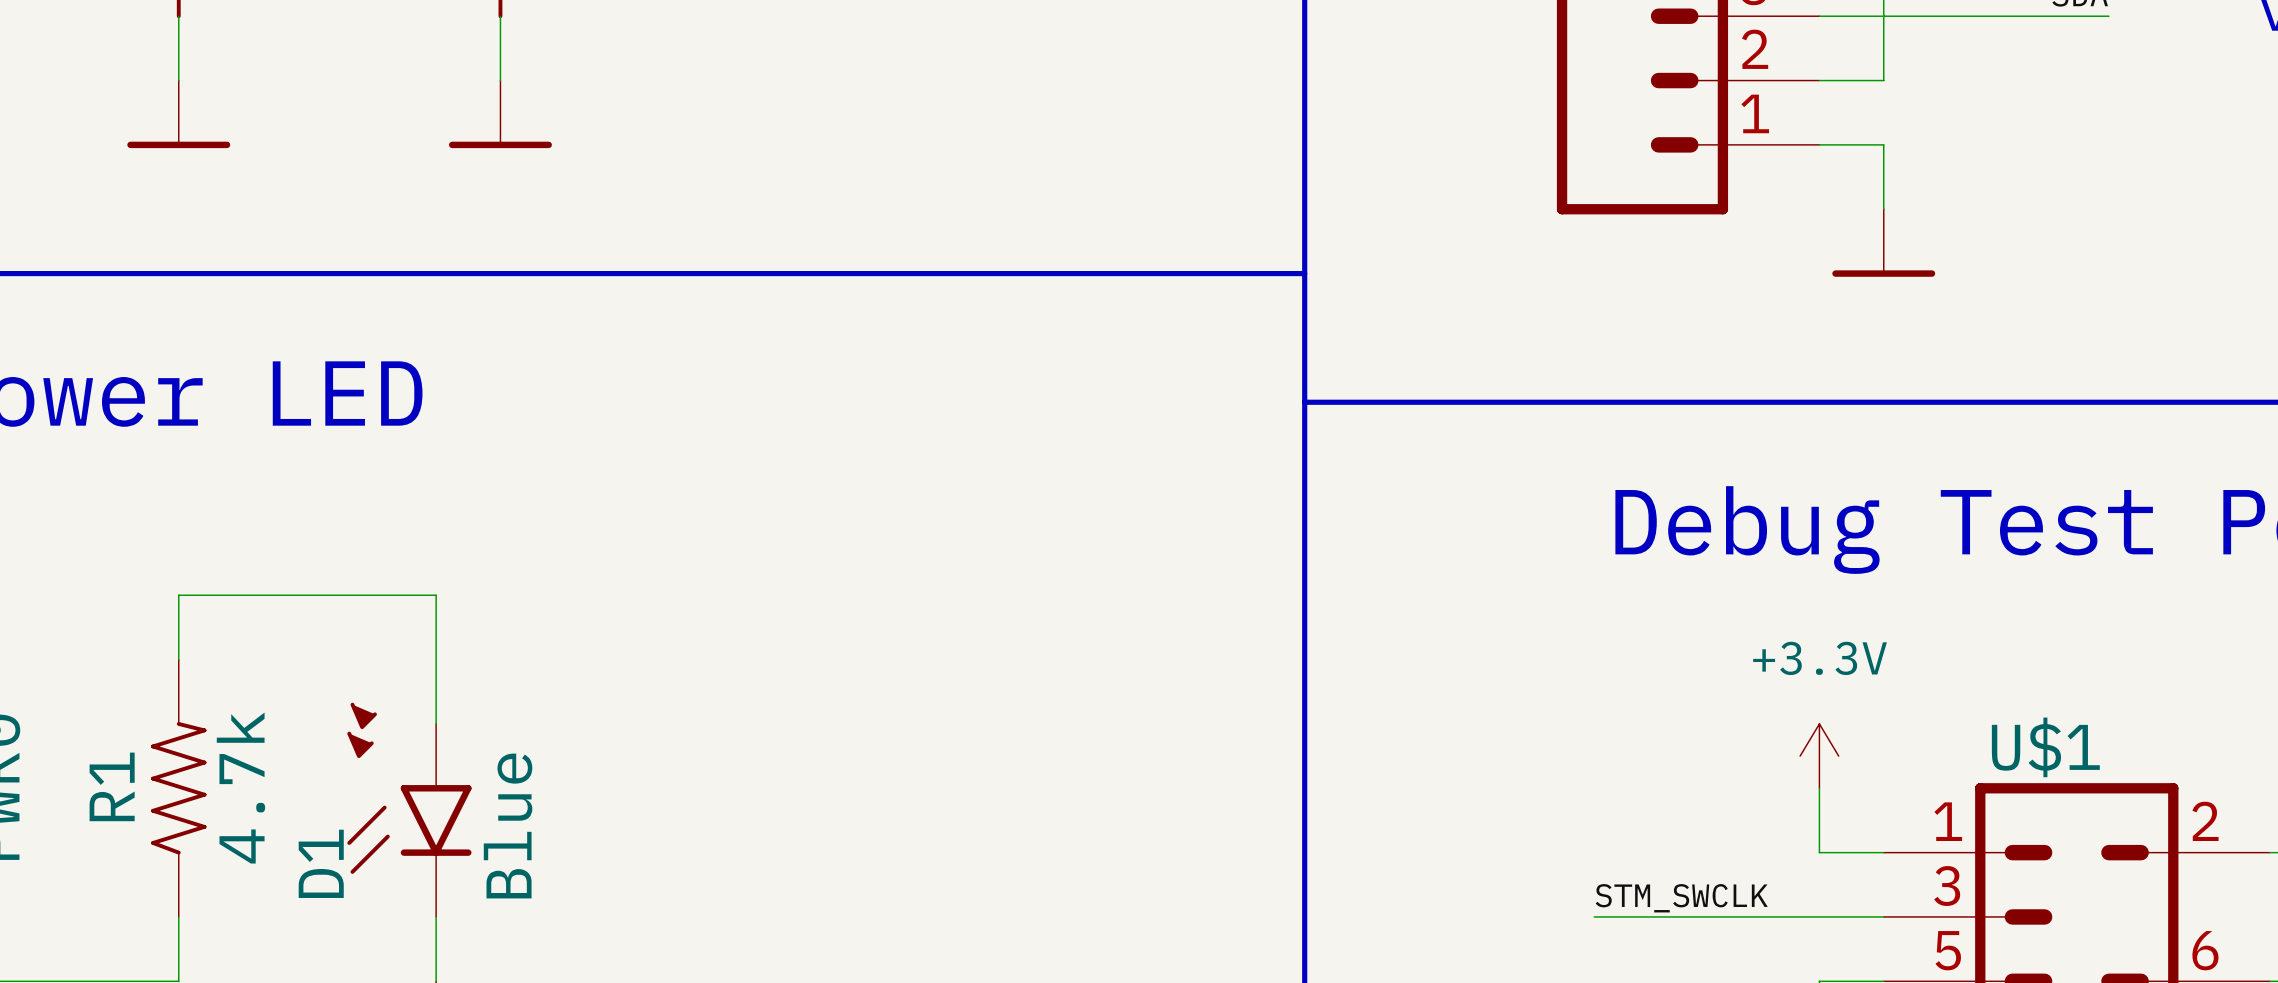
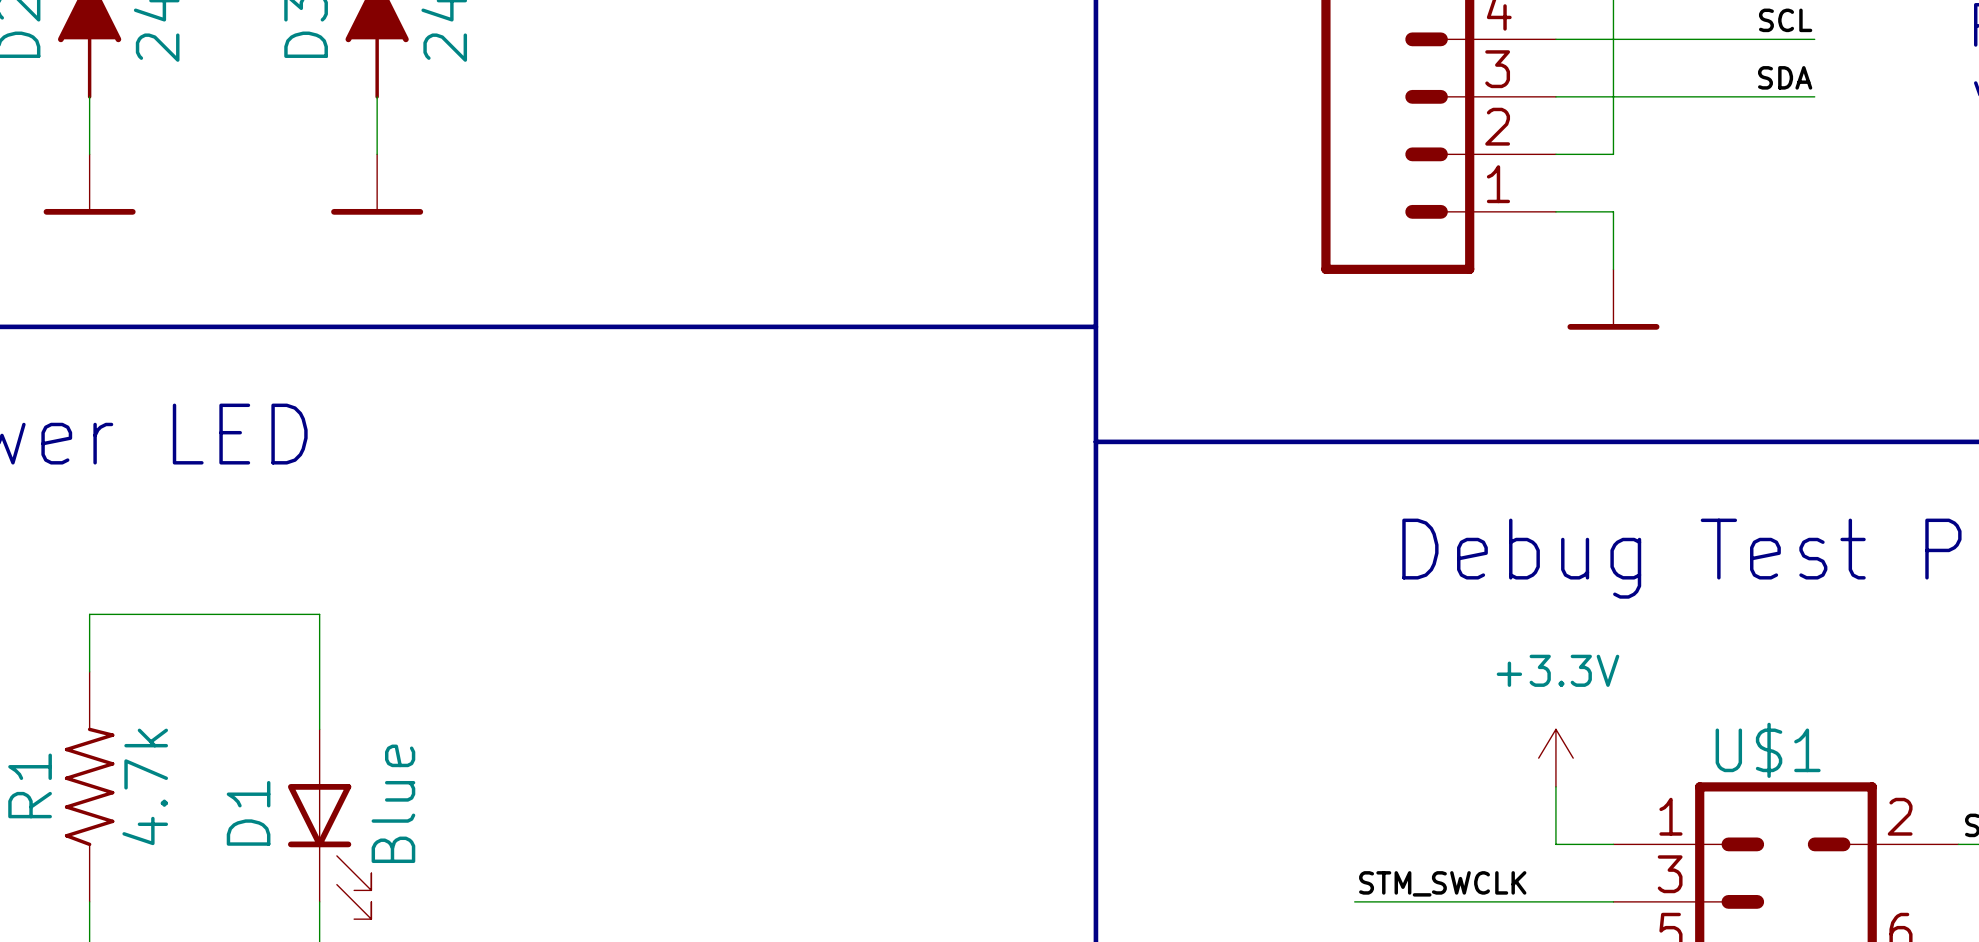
D1 symbol: [347, 702, 472, 917] -> [288, 729, 372, 920]
D1 name position: D1 (321, 863) -> D1 (248, 813)

